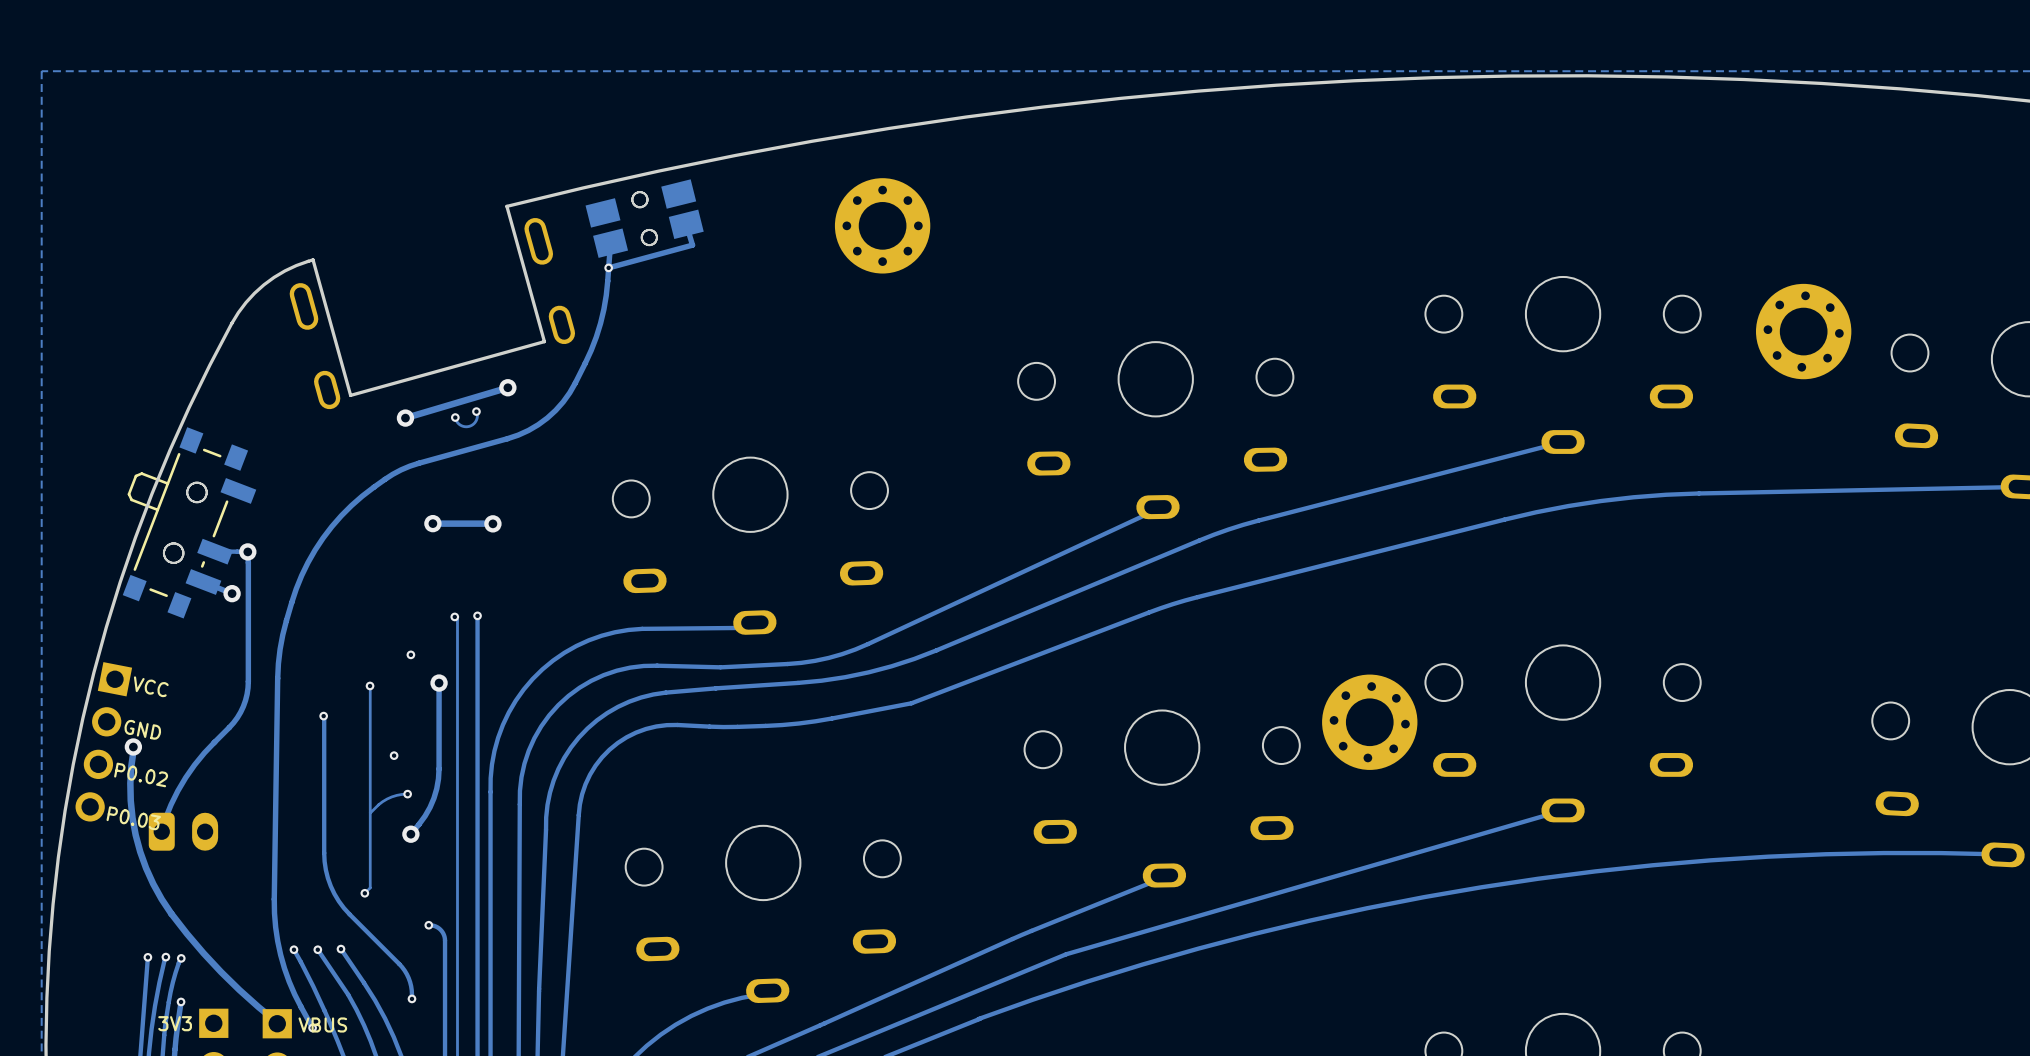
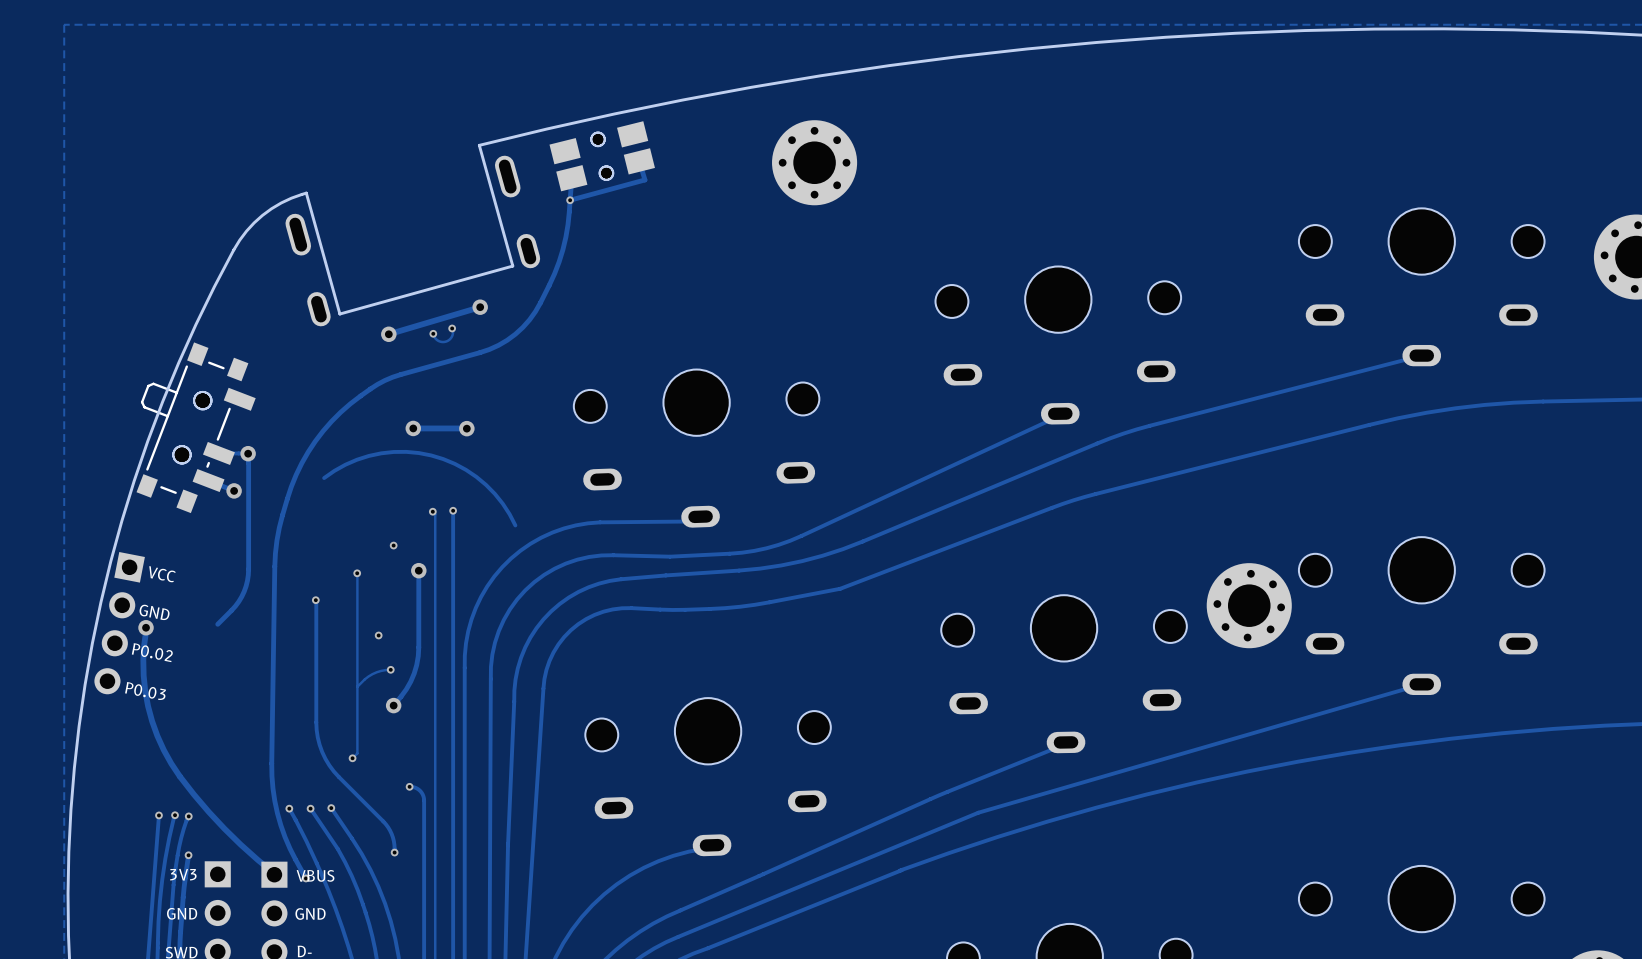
track: none -> (324, 478) (345, 464) (368, 455) (393, 451) (431, 455) (454, 463) (486, 484) (502, 503) (515, 525)
track: (215, 741) (185, 777) (165, 819) -> none
part: (183, 831) -> none

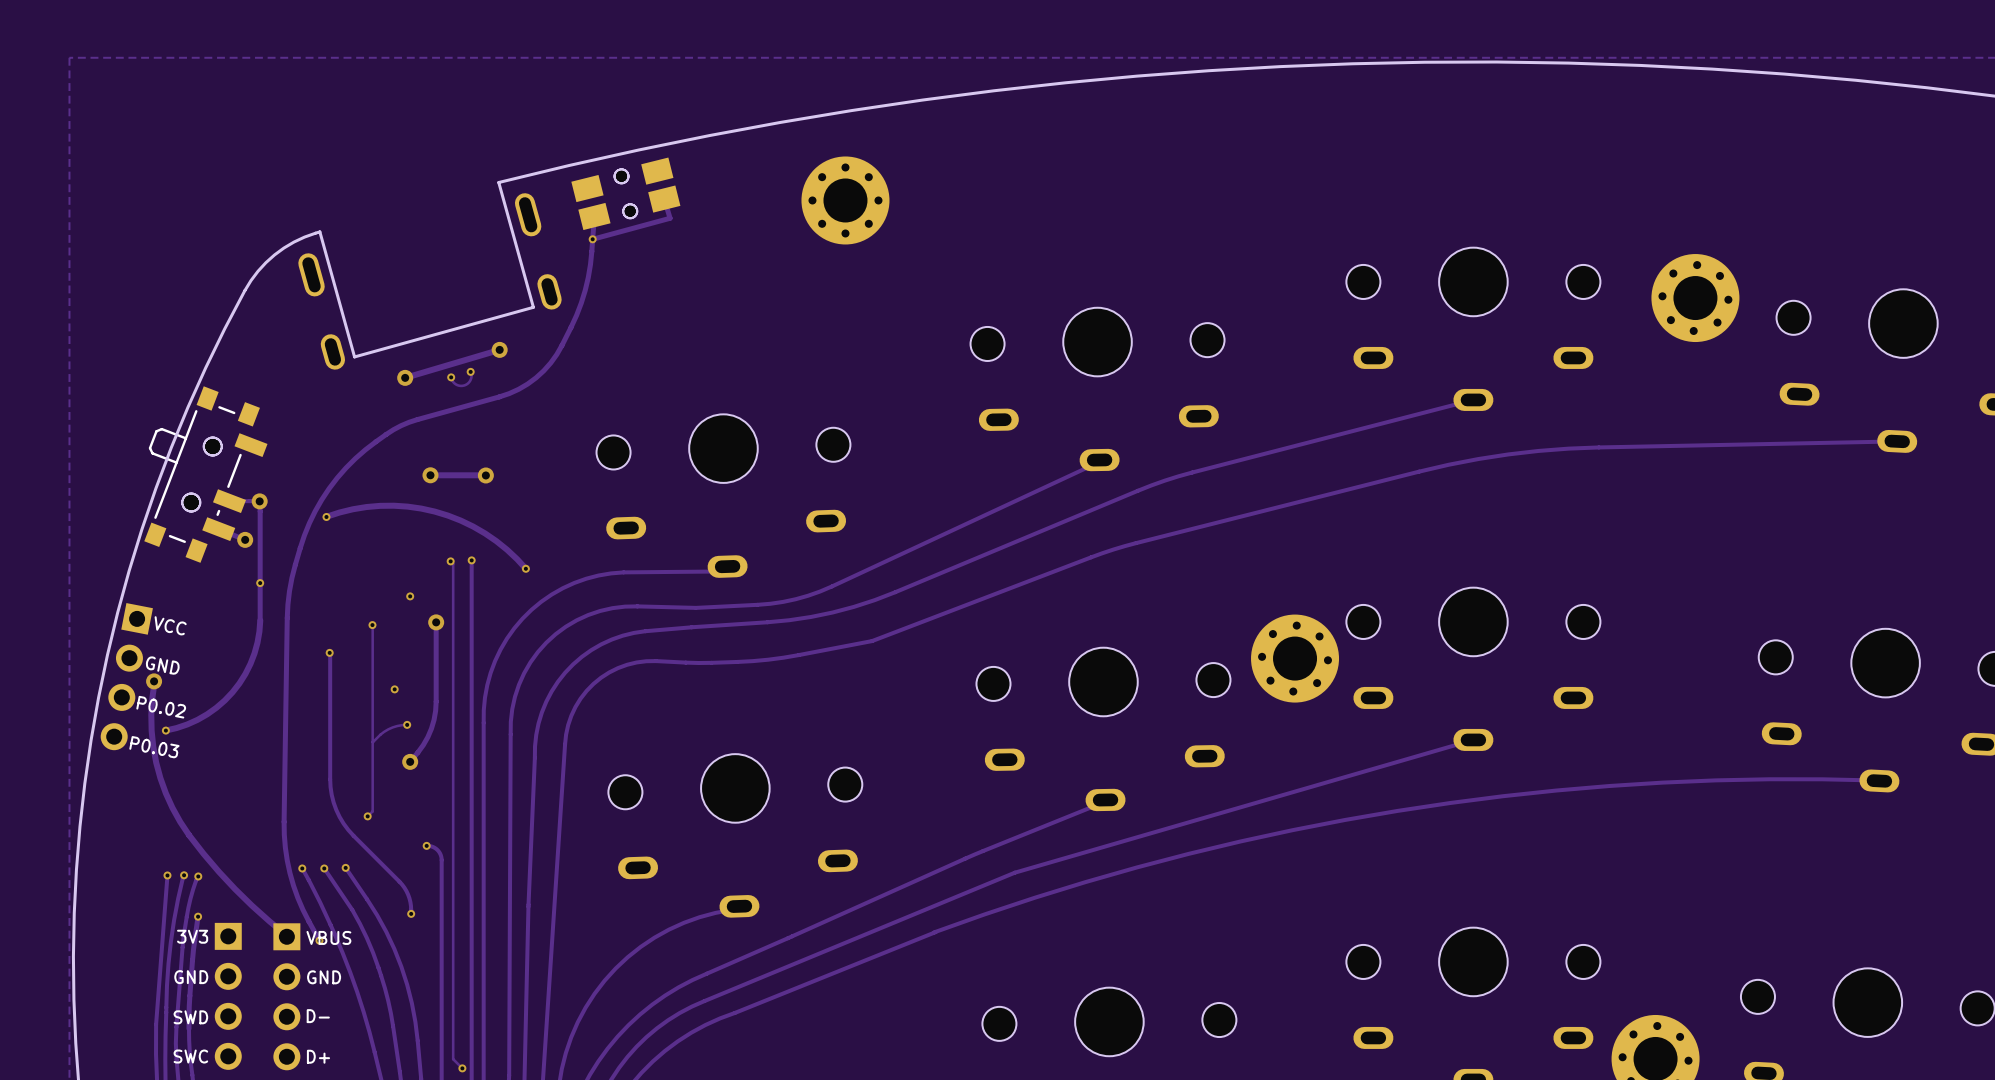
track: none -> (326, 516) (352, 509) (380, 505) (407, 506) (434, 511) (460, 520) (485, 533) (507, 549) (526, 569)
via: none -> (326, 516)
track: (324, 478) (345, 464) (368, 455) (393, 451) (431, 455) (454, 463) (486, 484) (502, 503) (515, 525) -> none
via: none -> (525, 568)
via: none -> (260, 583)
track: (248, 569) (246, 586) (241, 596) (217, 624) -> (260, 620) (254, 653) (245, 673) (232, 692) (207, 714) (187, 724) (165, 730)
via: none -> (165, 730)

